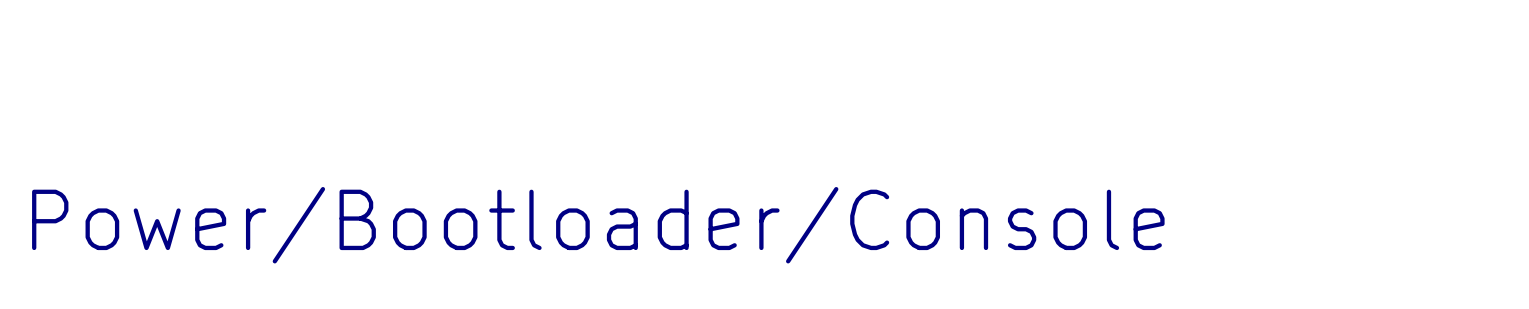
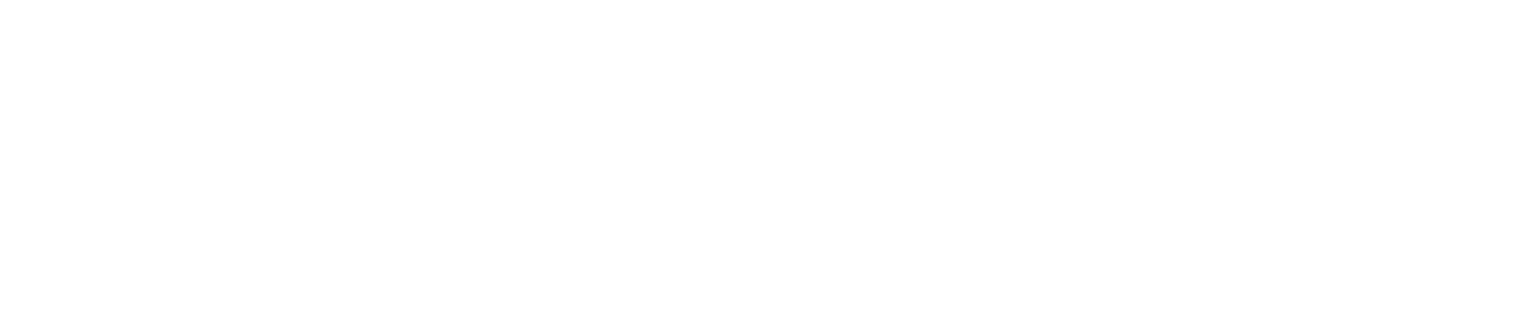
text: Power/Bootloader/Console (598, 225) -> none

